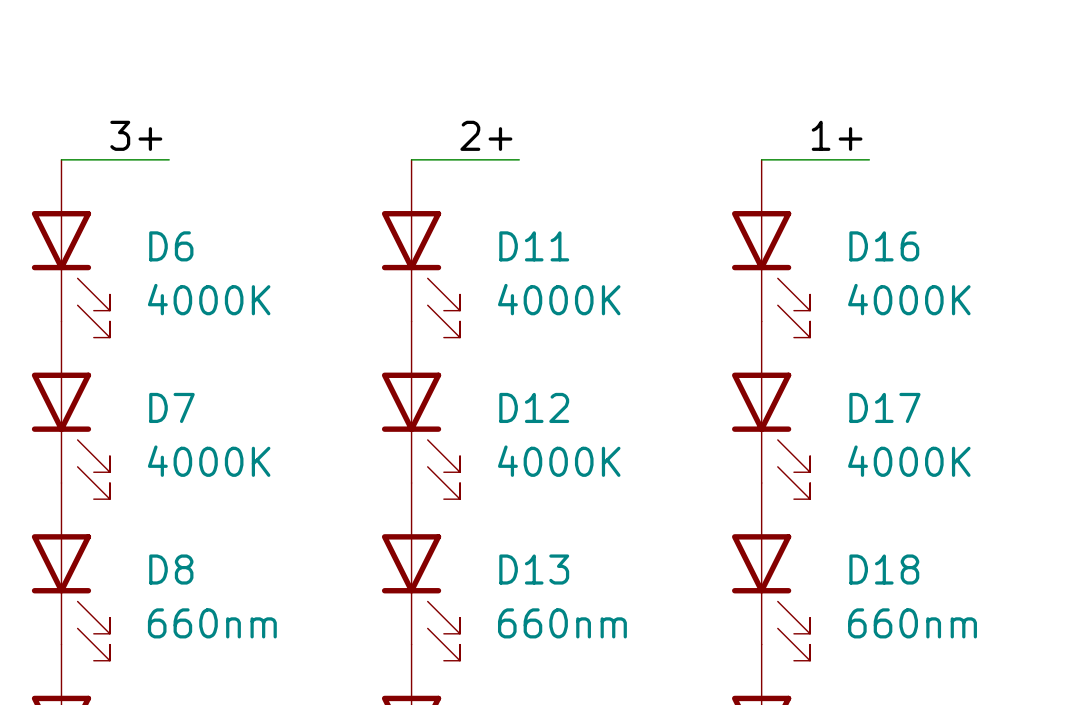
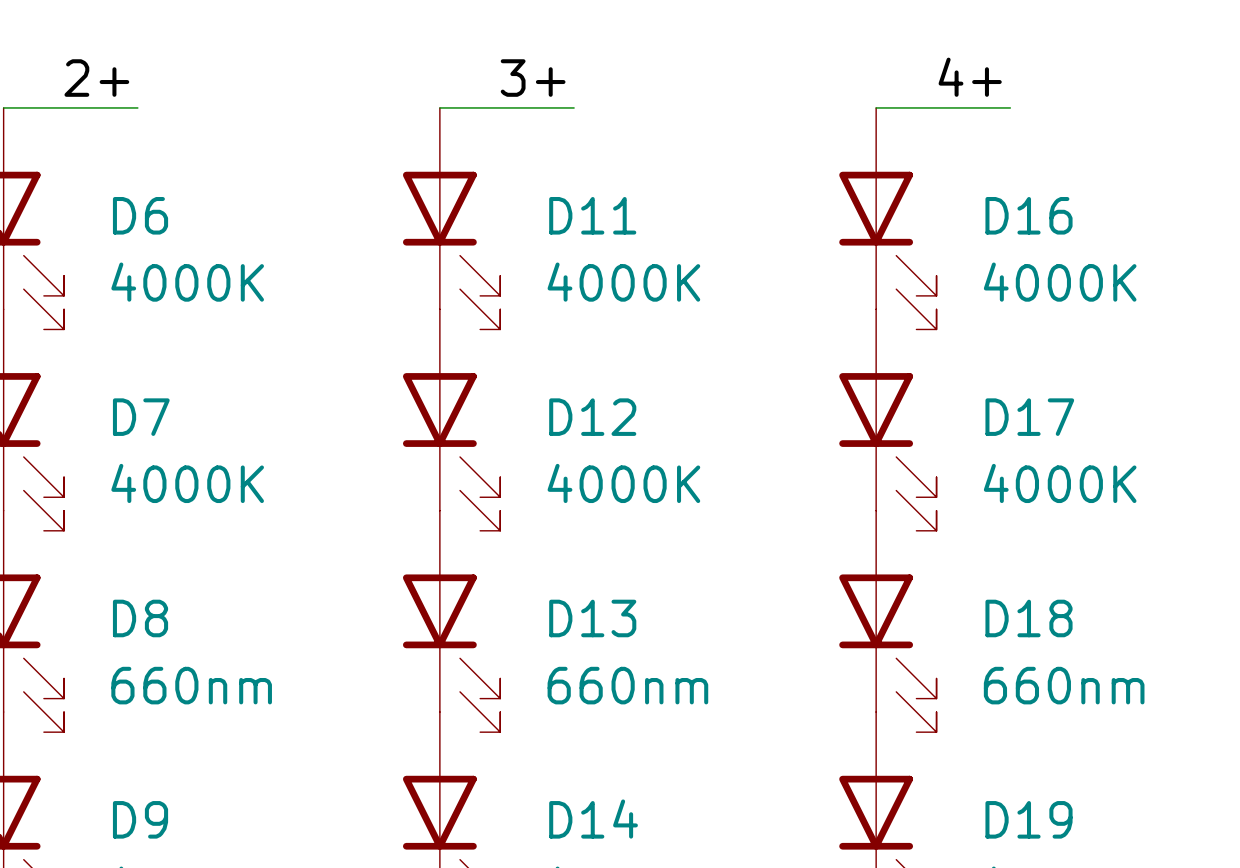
label: 3+ (136, 135) -> 2+ (96, 78)
label: 2+ (486, 135) -> 3+ (533, 78)
label: 1+ (837, 135) -> 4+ (970, 77)

